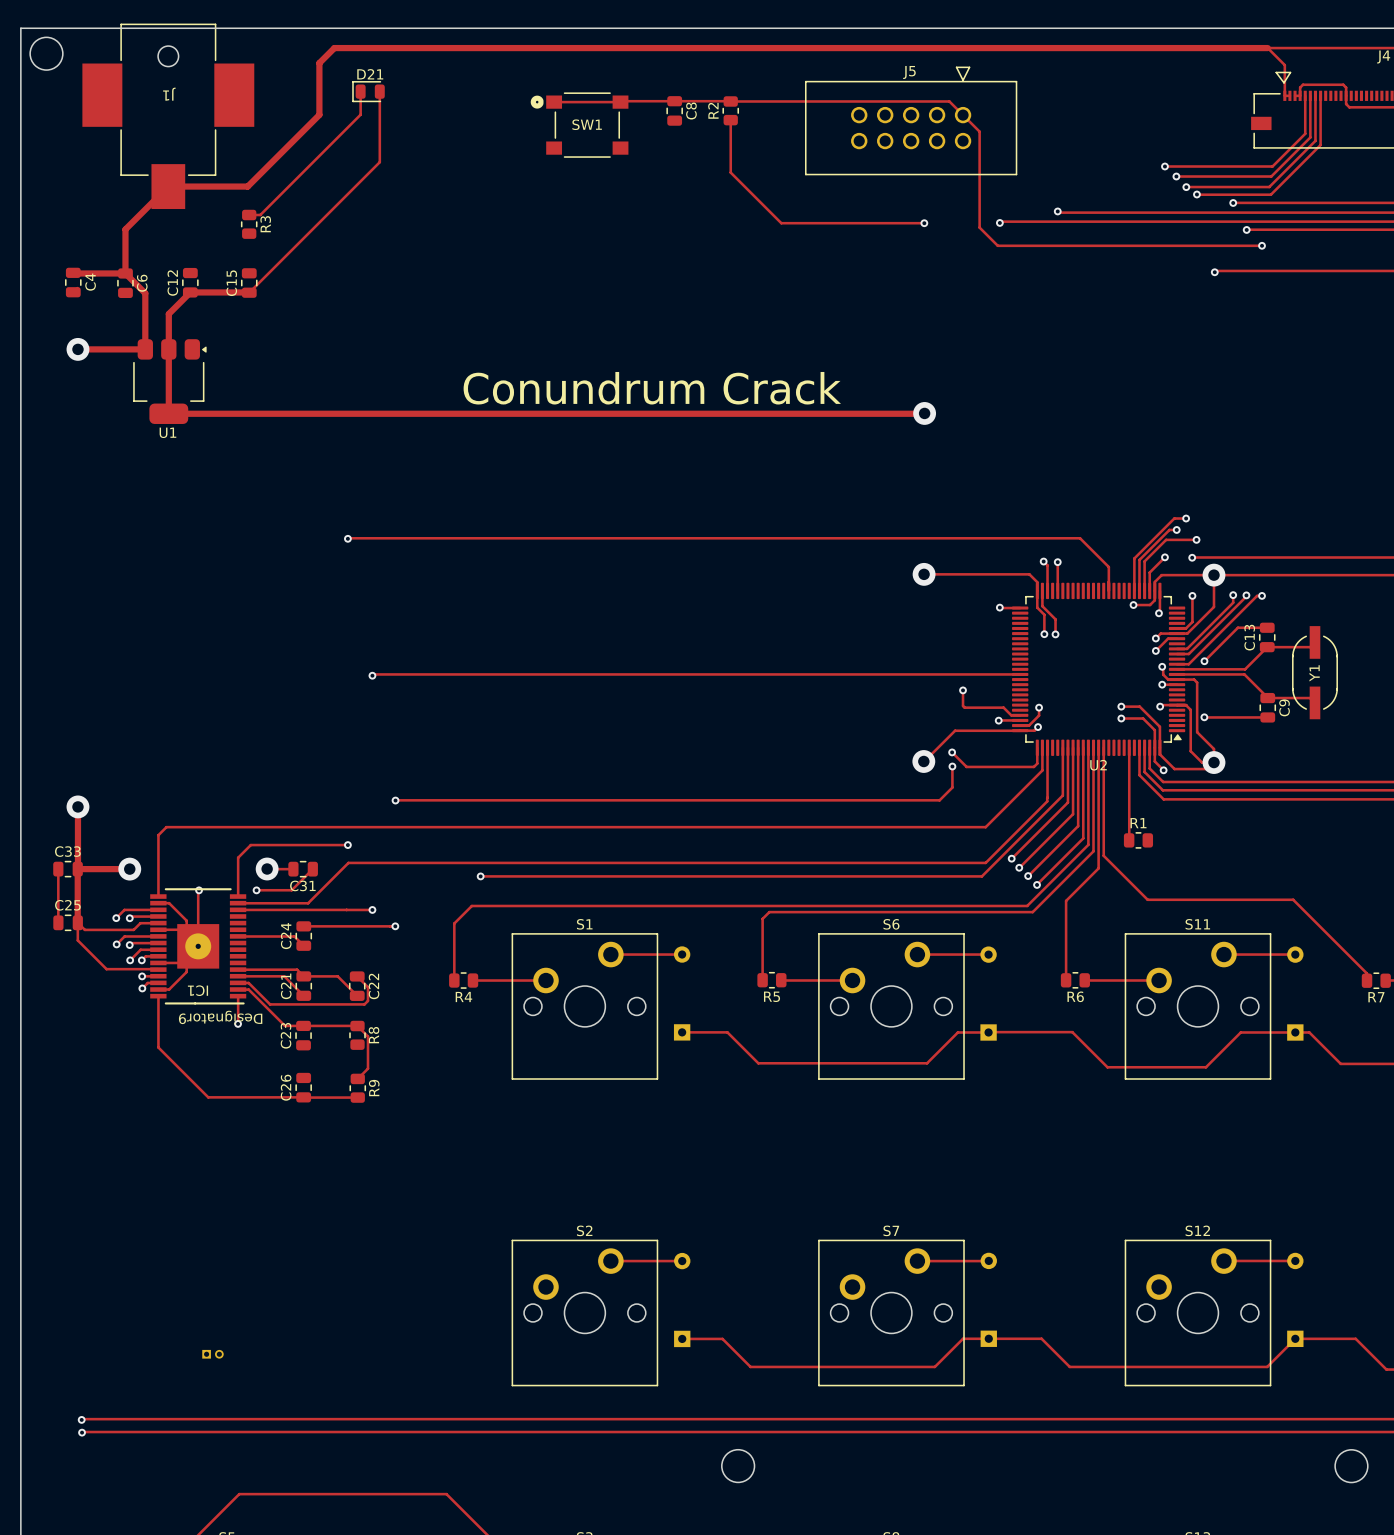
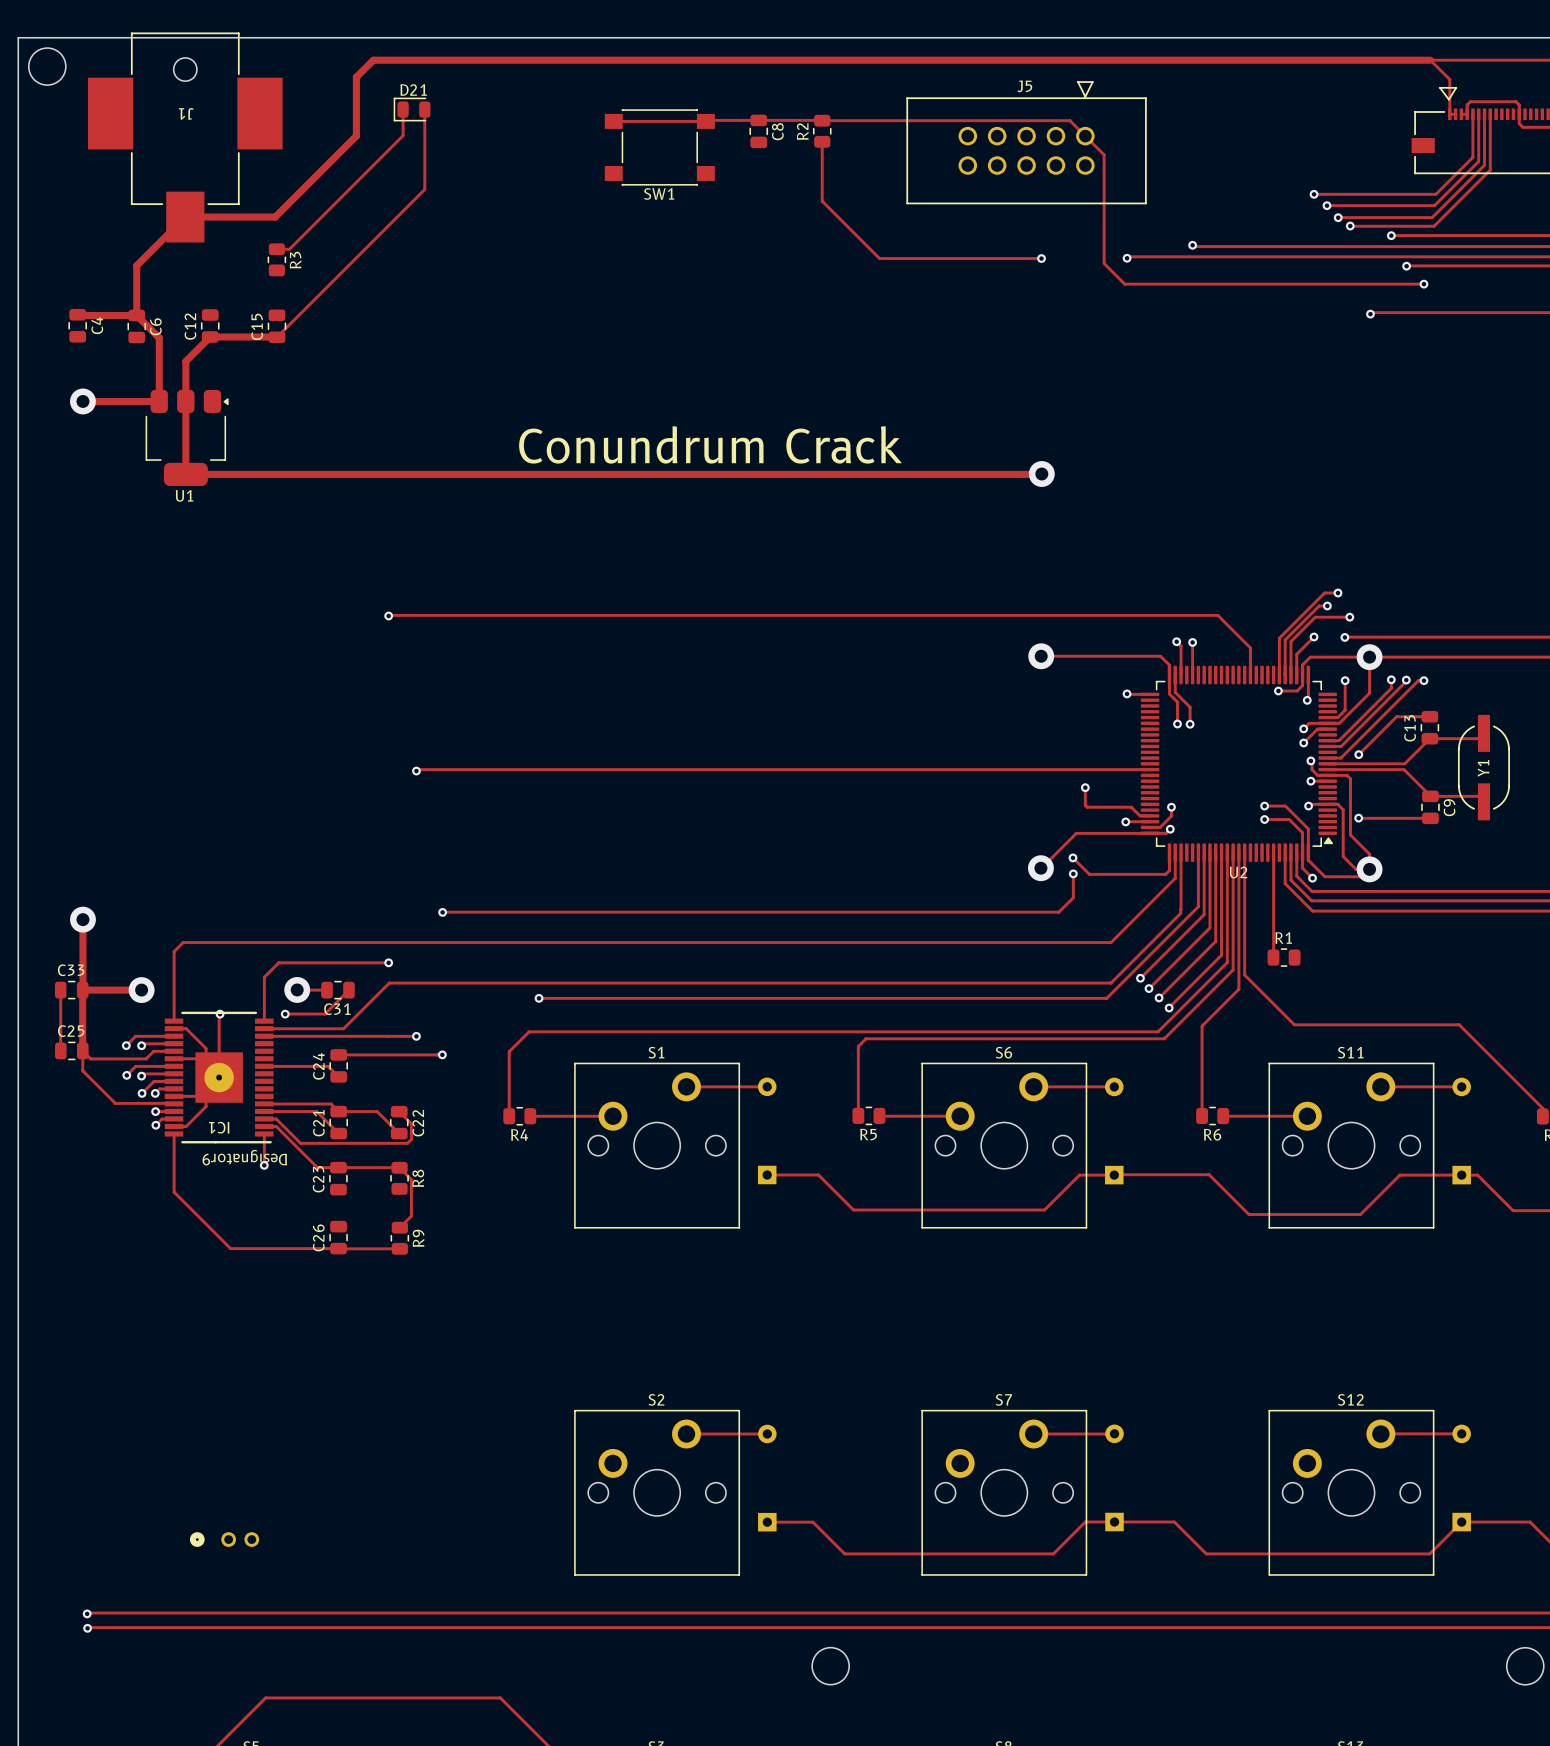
SW1 footprint: [530, 92, 629, 158] -> [604, 109, 715, 186]
SW1 name position: SW1 (587, 124) -> SW1 (659, 193)
part footprint: [202, 1349, 224, 1359] -> [189, 1532, 260, 1547]

